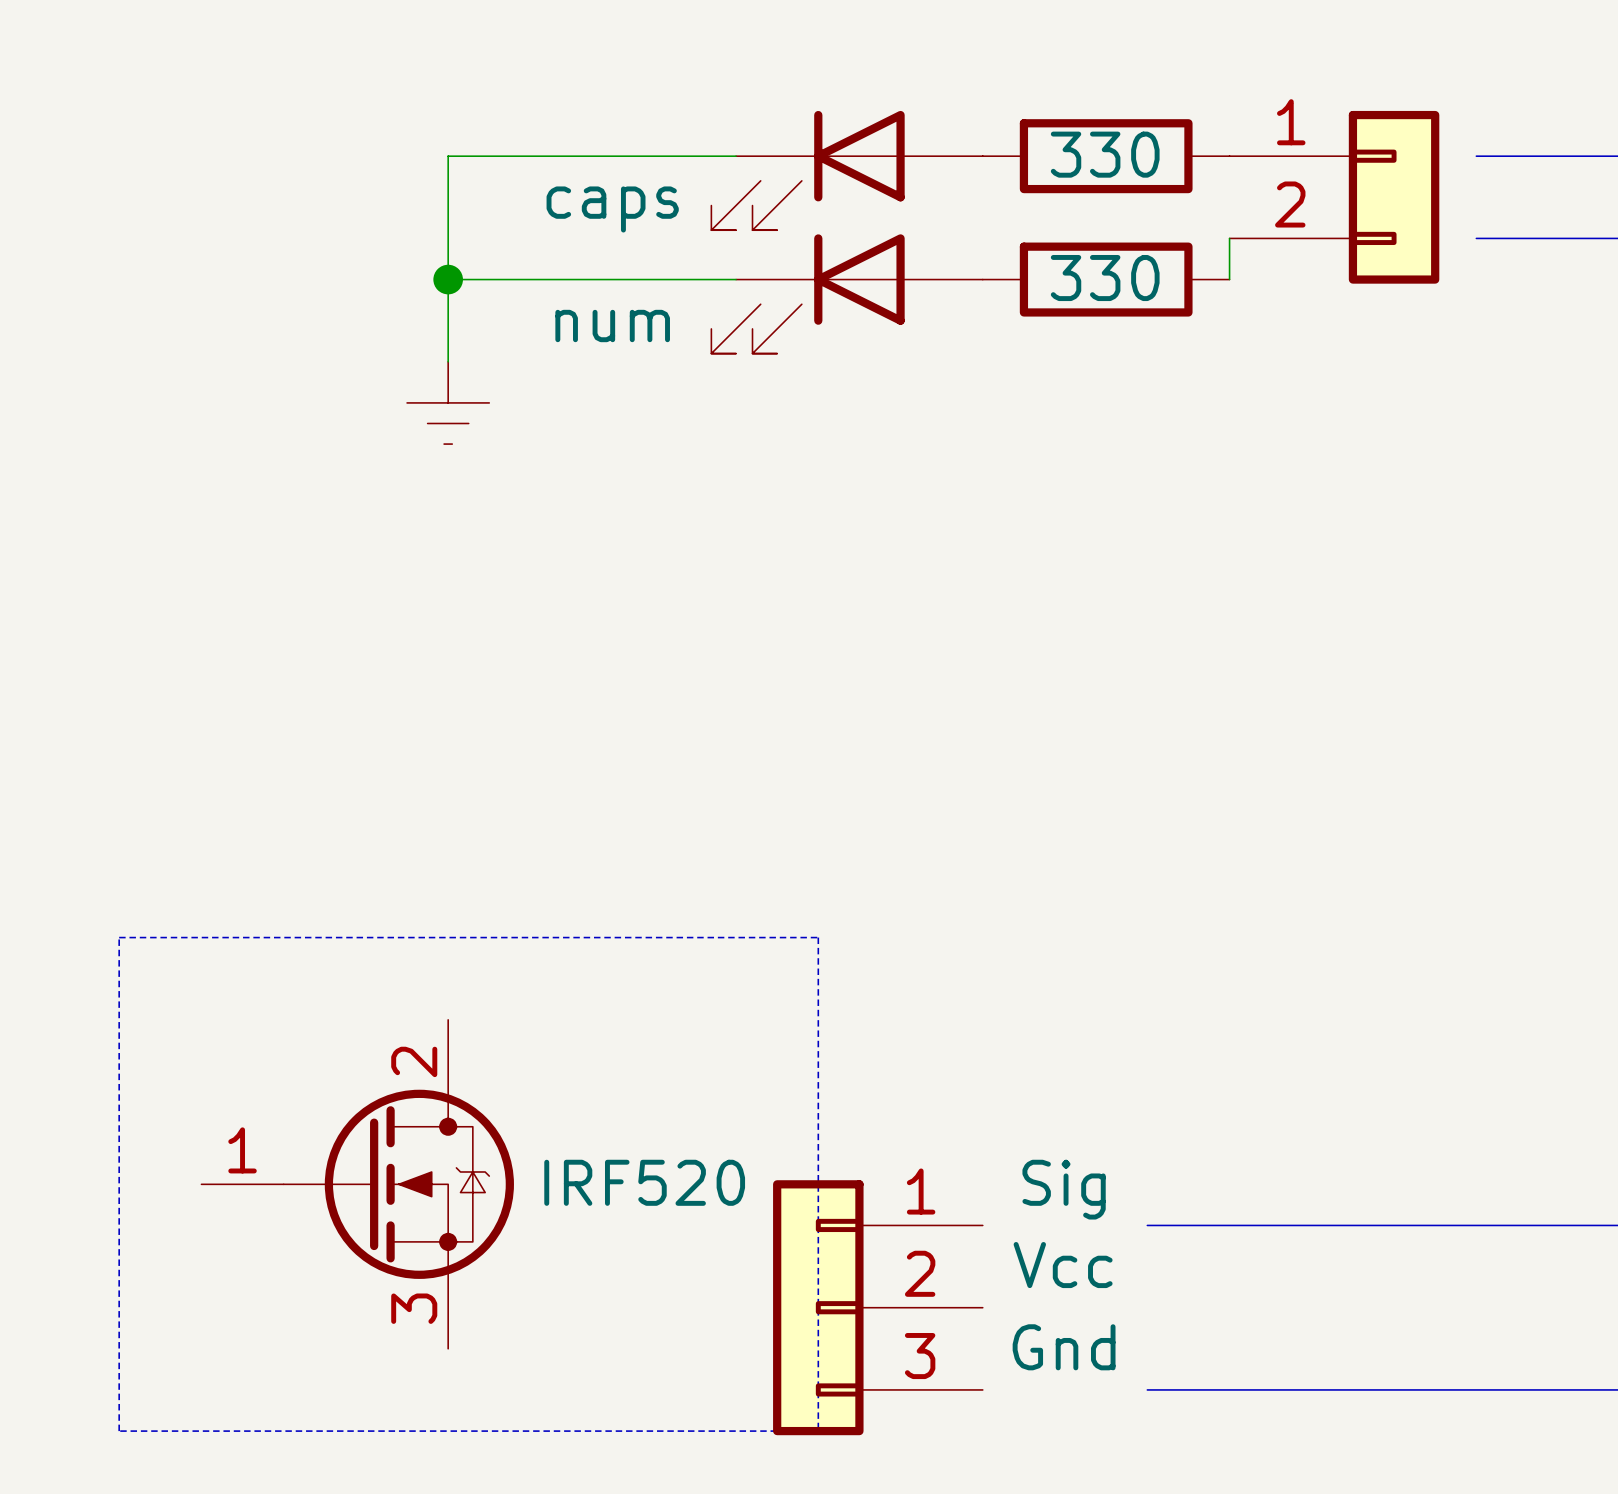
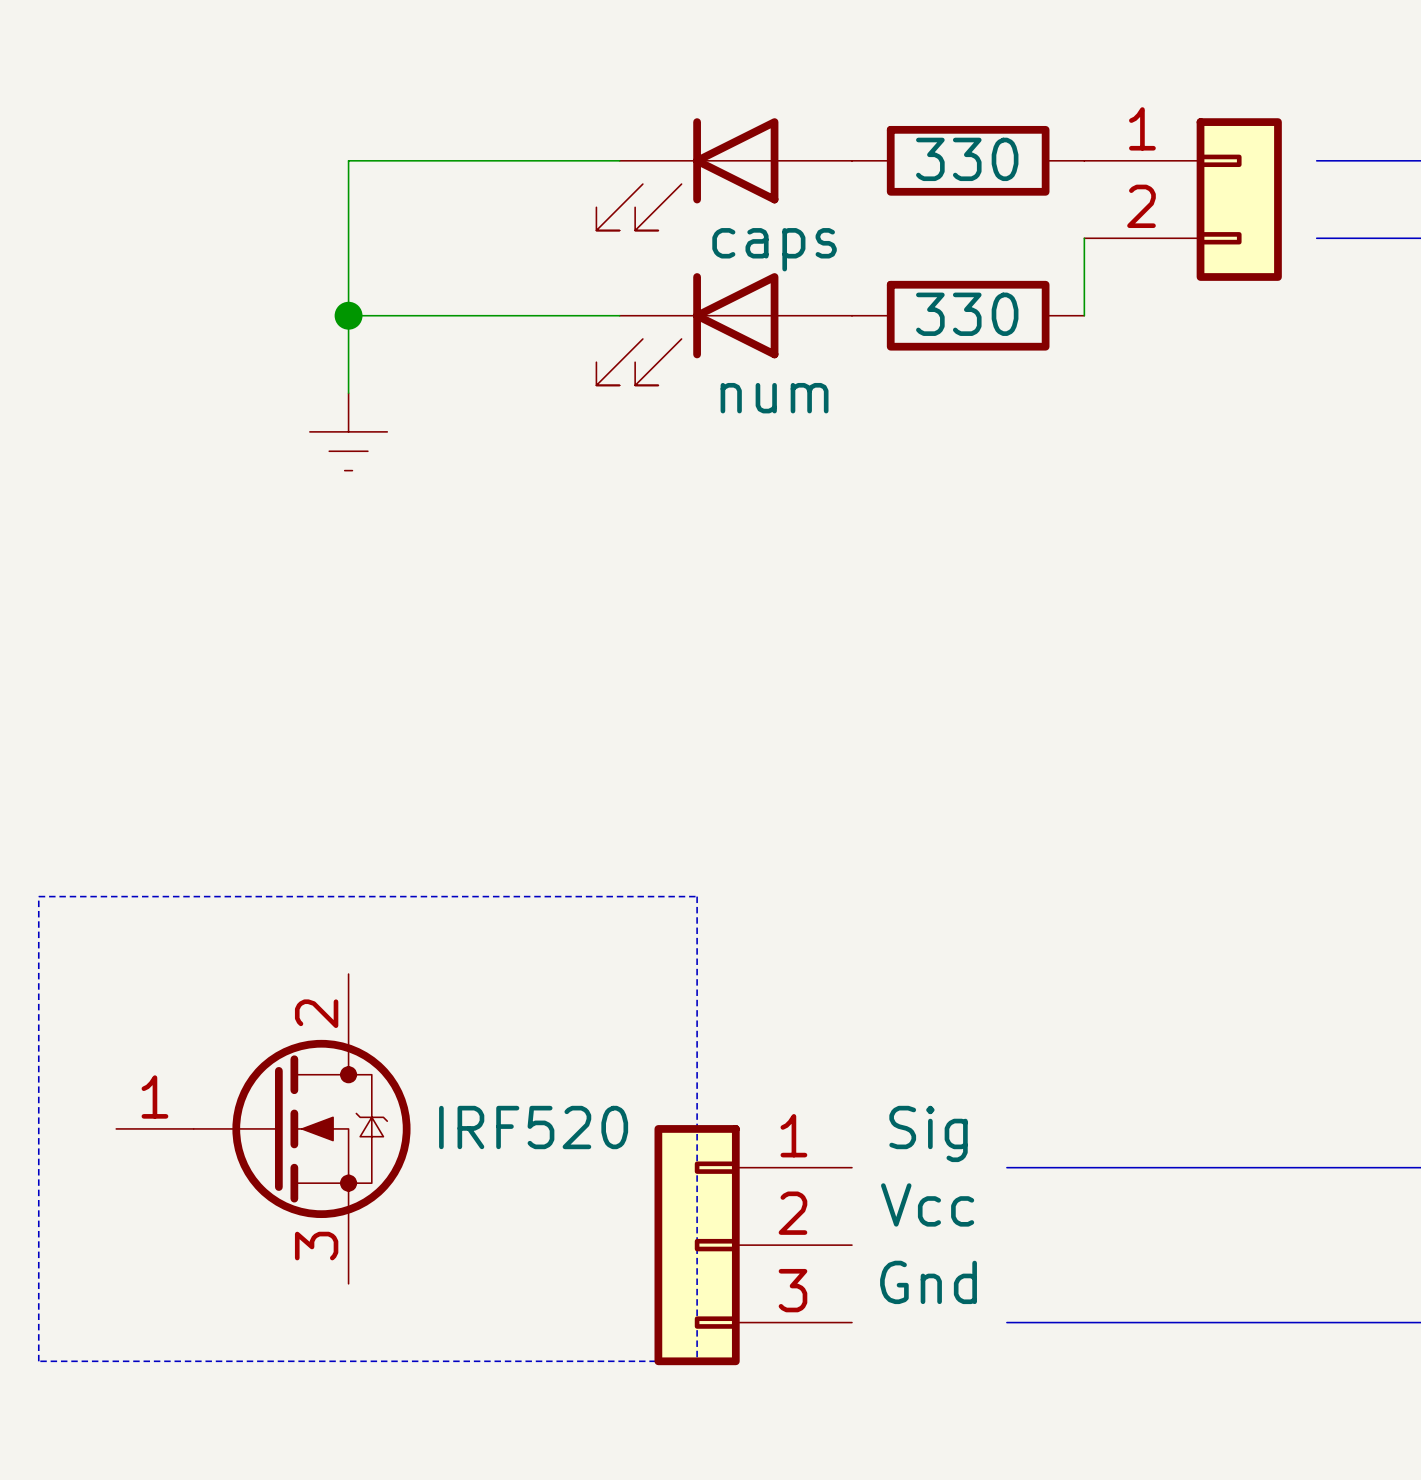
caps name position: caps (612, 209) -> caps (774, 249)
wire: (448, 279) (736, 279) -> (348, 315) (619, 315)
junction position: (448, 279) -> (348, 315)
part position: (1106, 279) -> (968, 315)
wire: none -> (1084, 276) (1084, 315)
num position: (847, 293) -> (724, 329)
num name position: num (612, 326) -> num (774, 398)
power symbol position: (448, 402) -> (348, 431)

